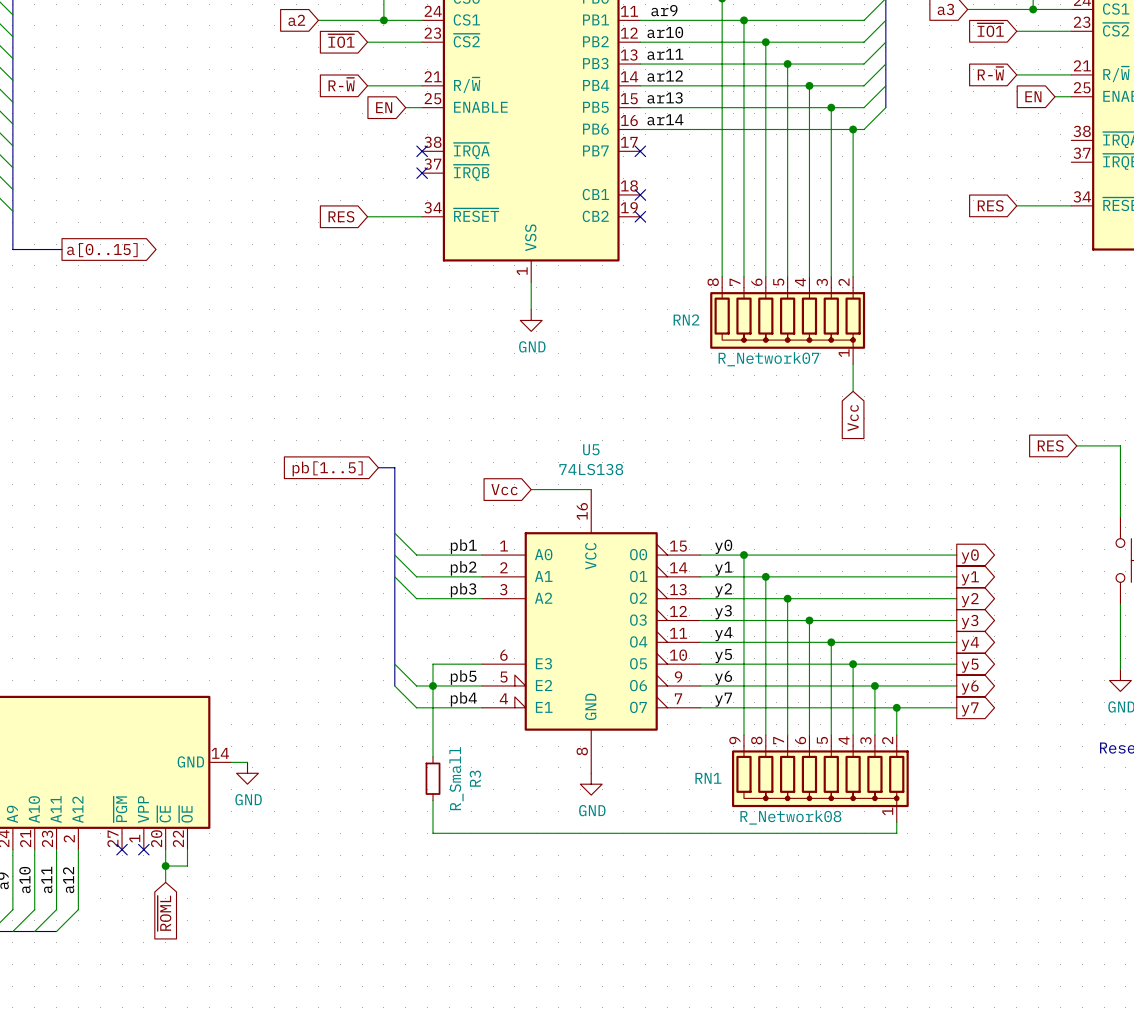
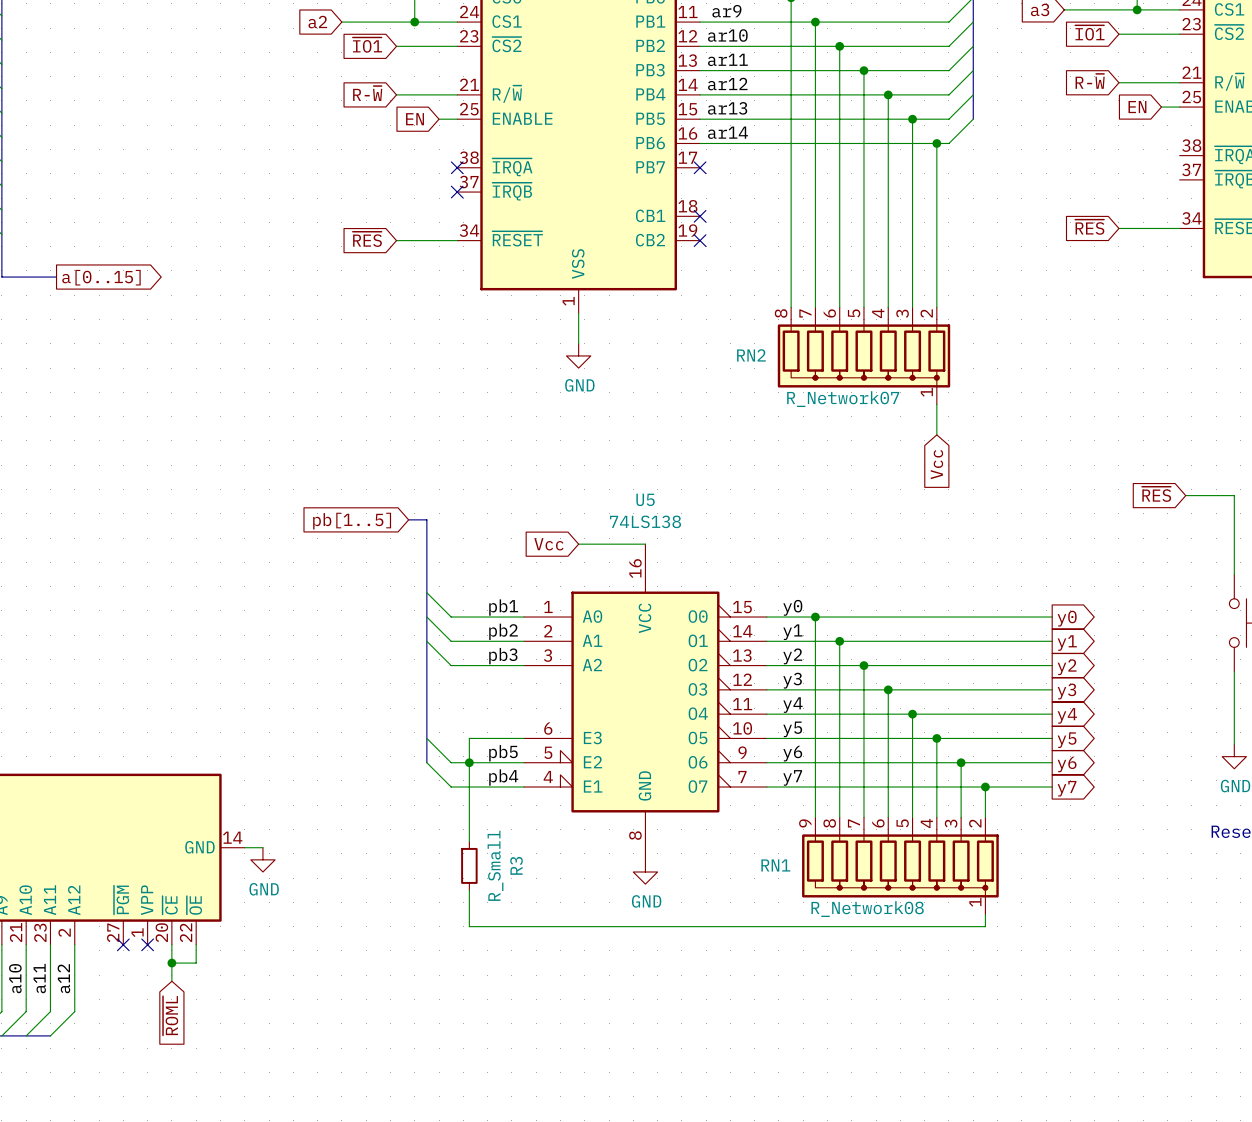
global label: RES (990, 205) -> ~{RES} (1089, 227)
global label: RES (341, 216) -> ~{RES} (367, 239)
global label: RES (1050, 445) -> ~{RES} (1156, 494)

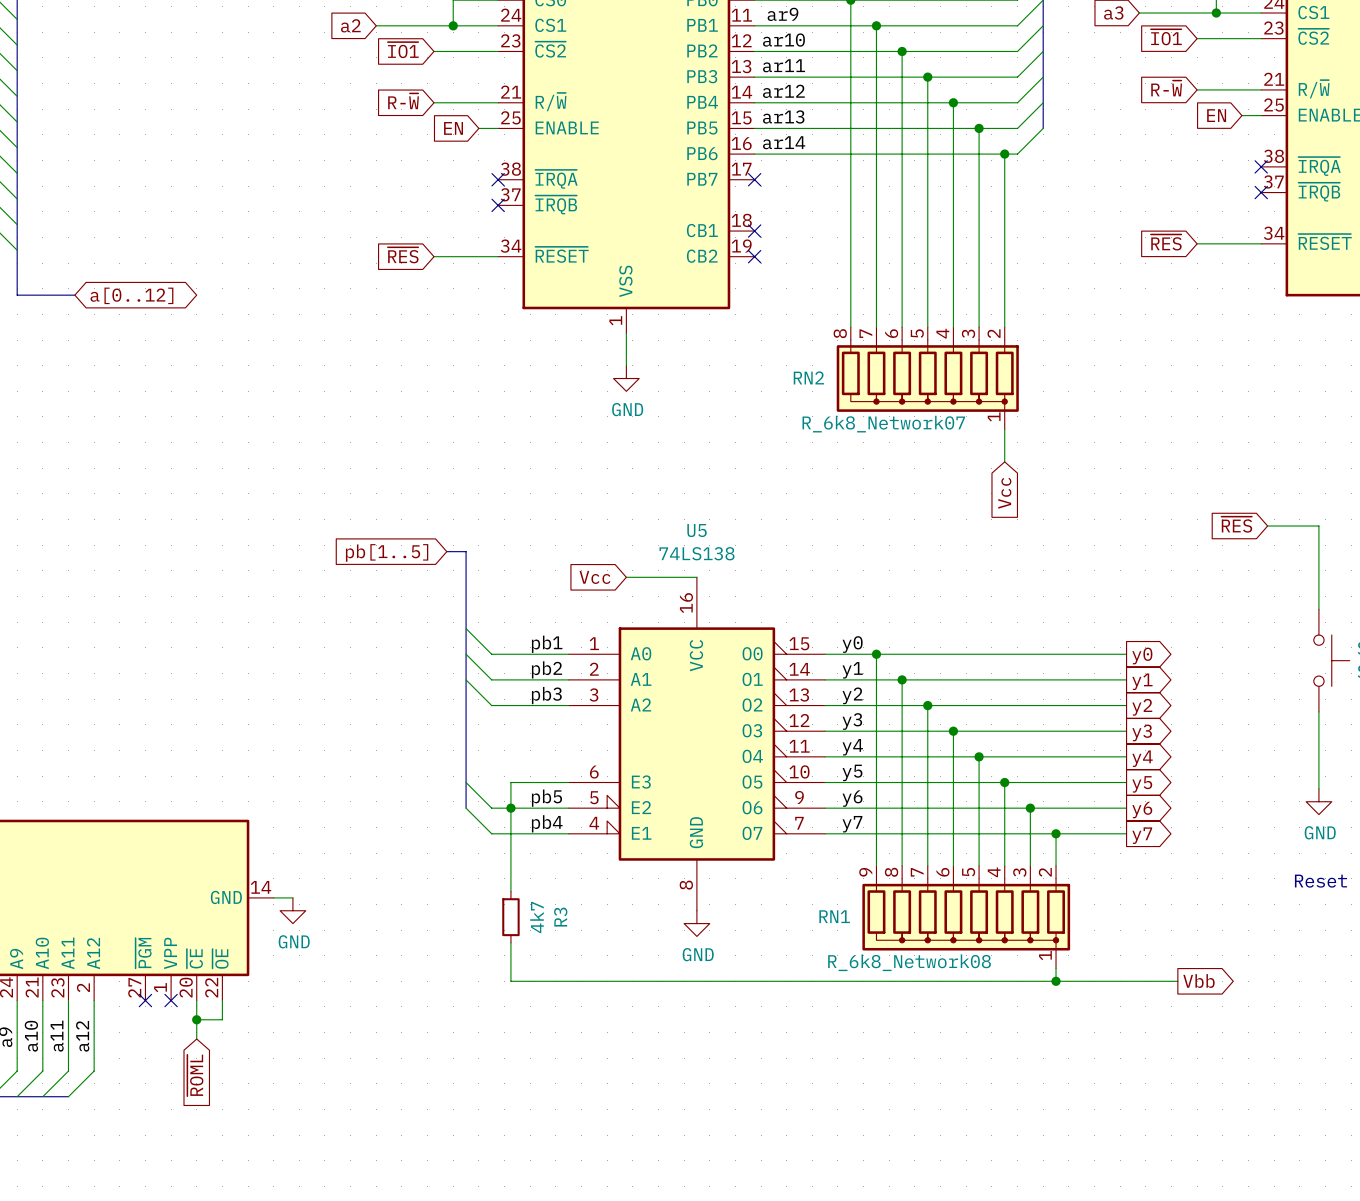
no-connect mark: none -> (1261, 166)
no-connect mark: none -> (1261, 192)
global label shape: output (101, 277) -> bidirectional (131, 295)
global label: a[0..15] (101, 277) -> a[0..12] (131, 295)
RN2 value: R_Network07 (843, 399) -> R_6k8_Network07 (883, 424)
R3 value: R_Small (495, 865) -> 4k7 (537, 917)
RN1 value: R_Network08 (867, 909) -> R_6k8_Network08 (909, 962)
wire: none -> (1056, 981) (1177, 981)
junction: none -> (1056, 981)
global label: none -> Vbb (1198, 981)

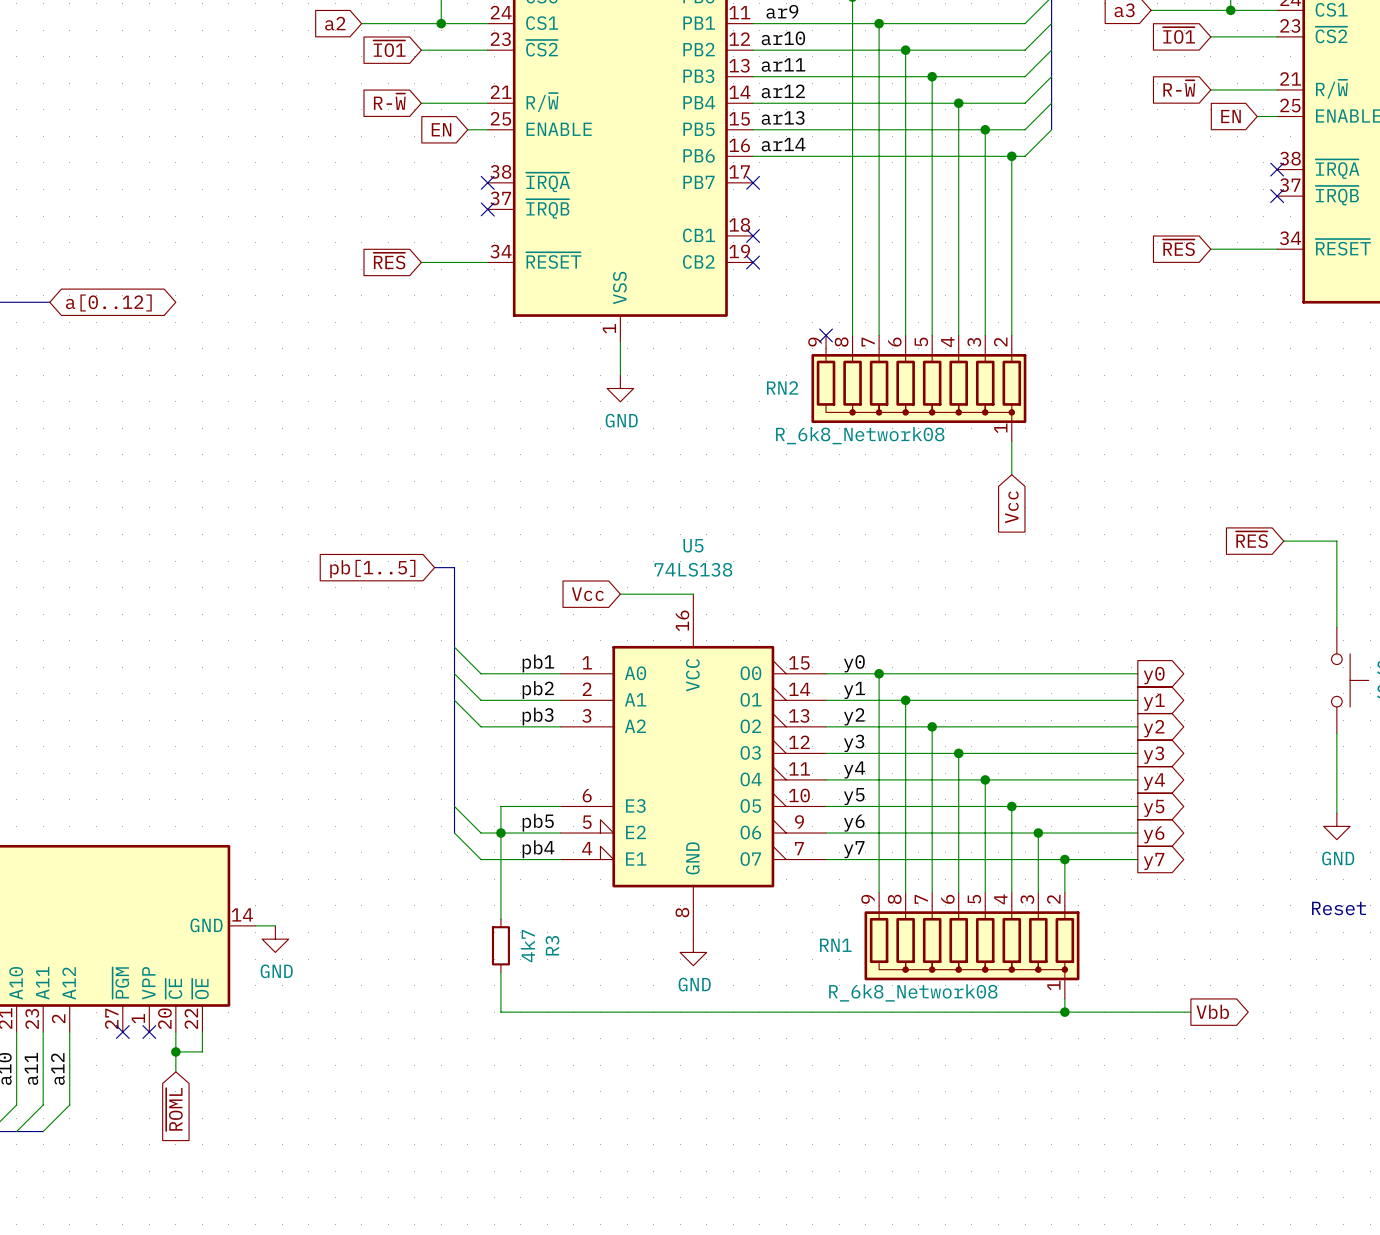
no-connect mark: none -> (826, 335)
RN2 symbol: [836, 327, 1019, 430] -> [811, 335, 1027, 442]
RN2 value: R_6k8_Network07 (883, 424) -> R_6k8_Network08 (860, 435)

